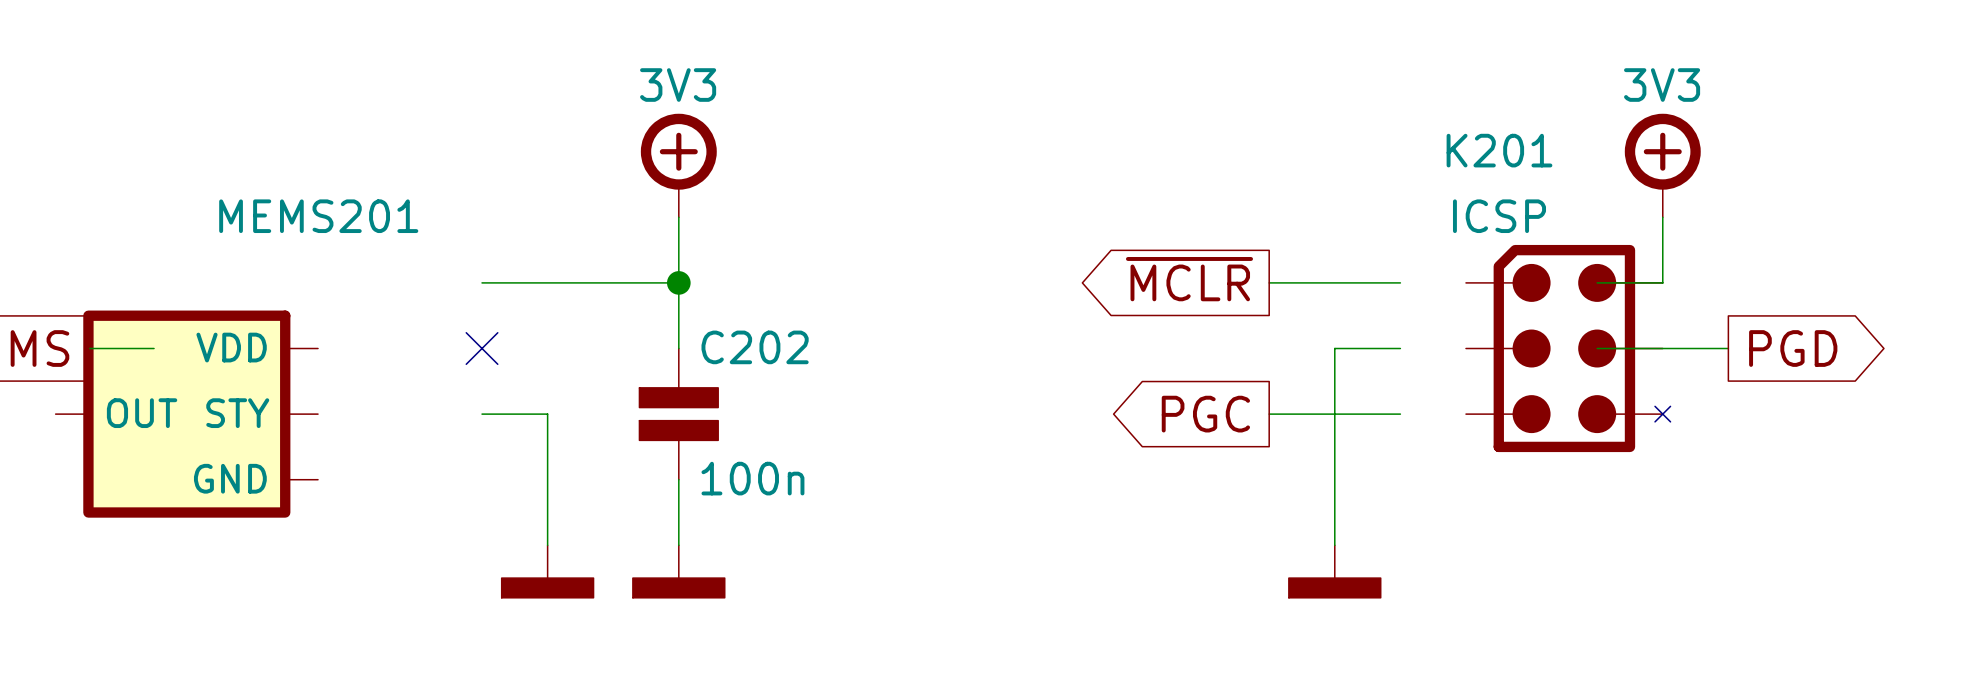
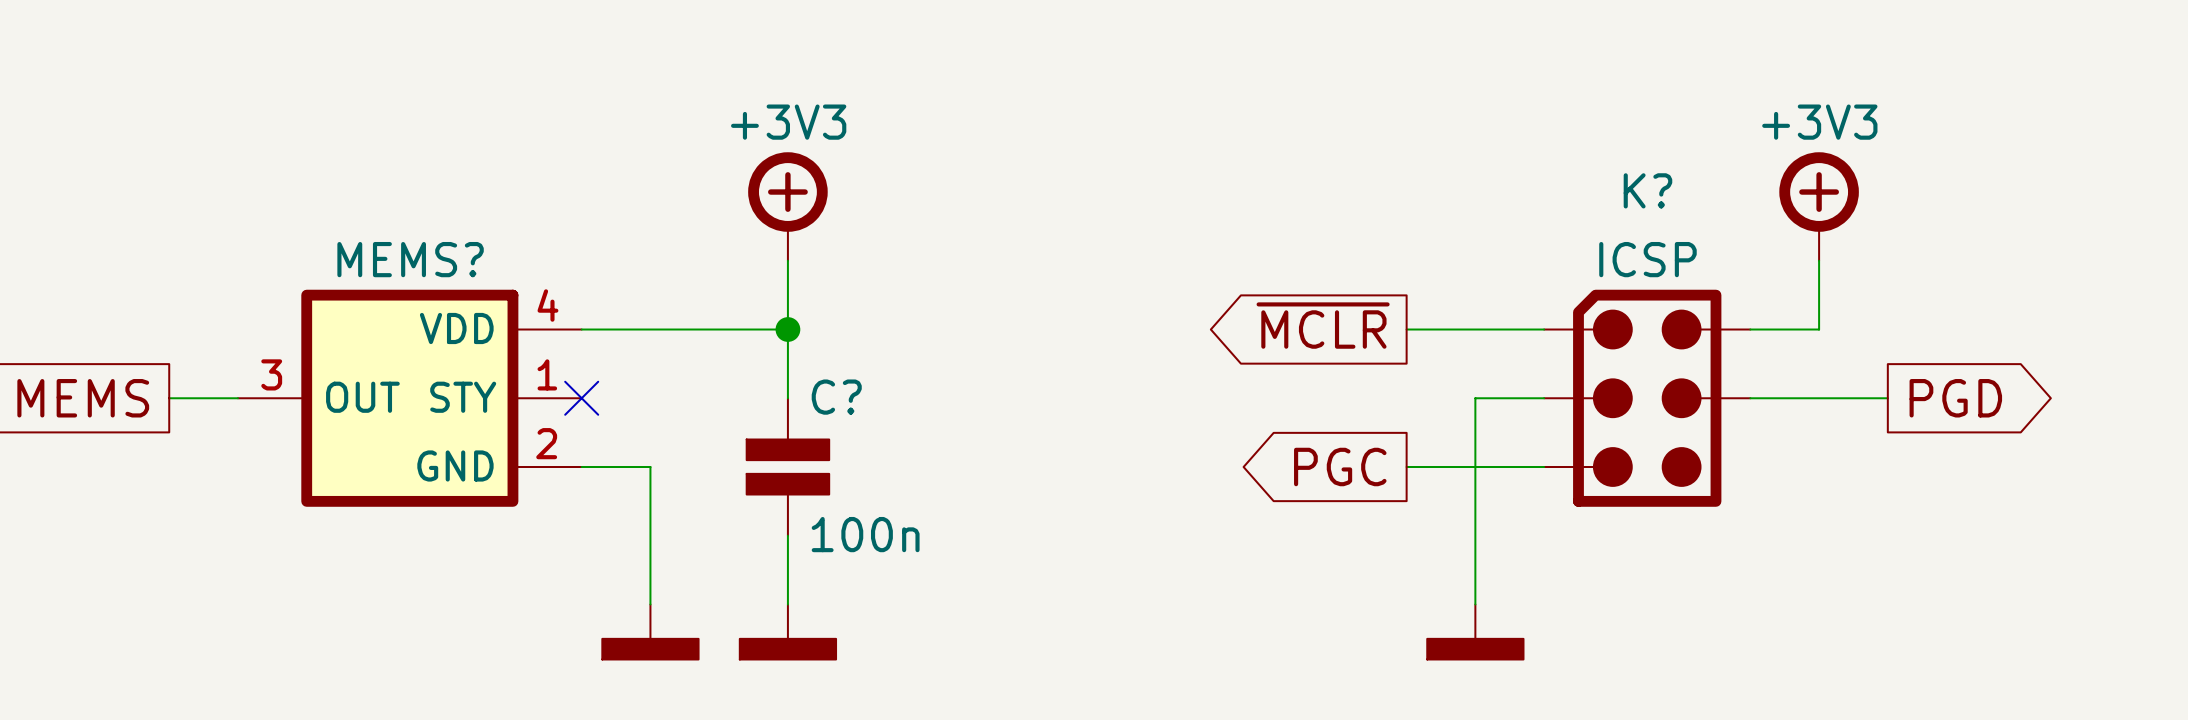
power symbol text: 3V3 (678, 85) -> +3V3 (788, 122)
power symbol text: 3V3 (1662, 85) -> +3V3 (1819, 122)
C202 name: C202 (755, 347) -> C? (836, 397)
MEMS?: none -> (409, 398)
K?: none -> ICSP (1647, 398)
K201: ICSP (1568, 348) -> none
MEMS201: (186, 414) -> none

